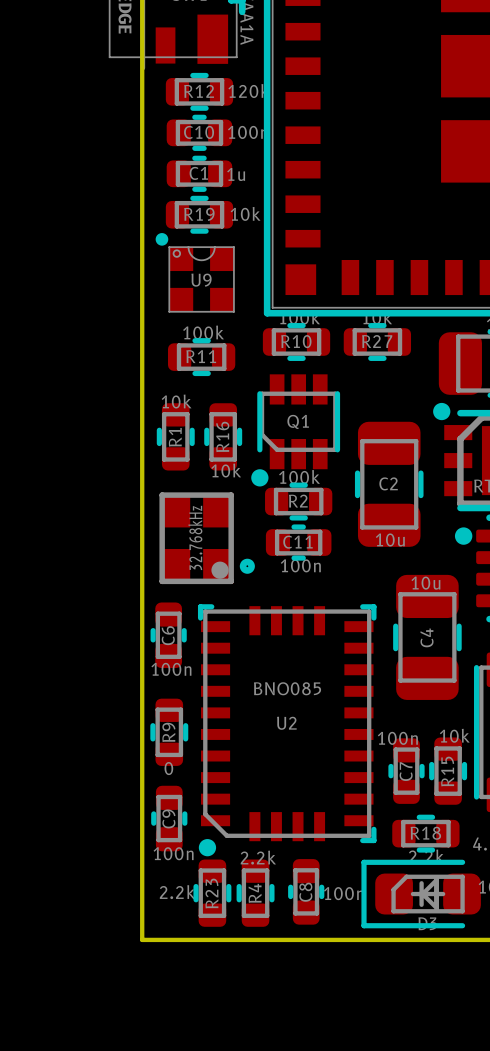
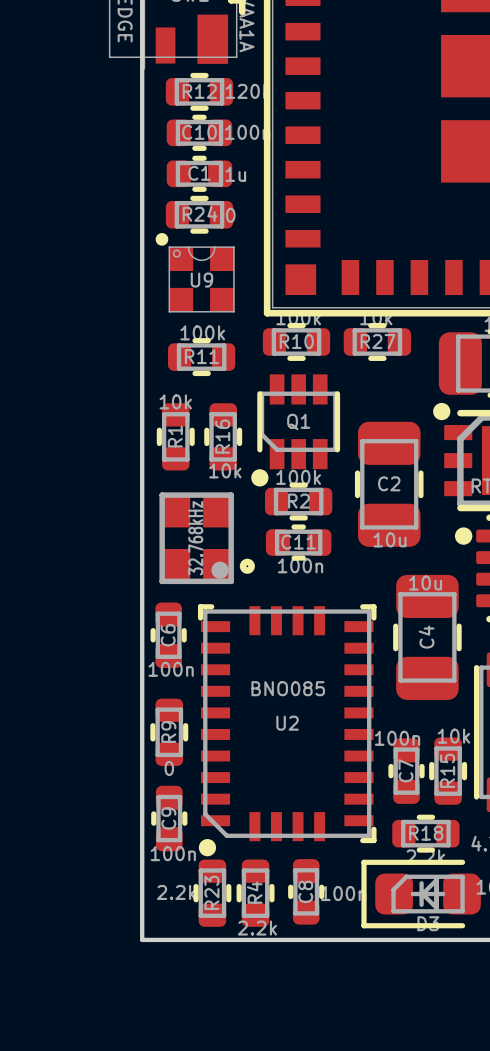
R19 value: 10k (245, 213) -> 0 (230, 215)
R19 name: R19 (199, 214) -> R24 (200, 213)
R4 value position: 2.2k (258, 857) -> 2.2k (257, 928)

